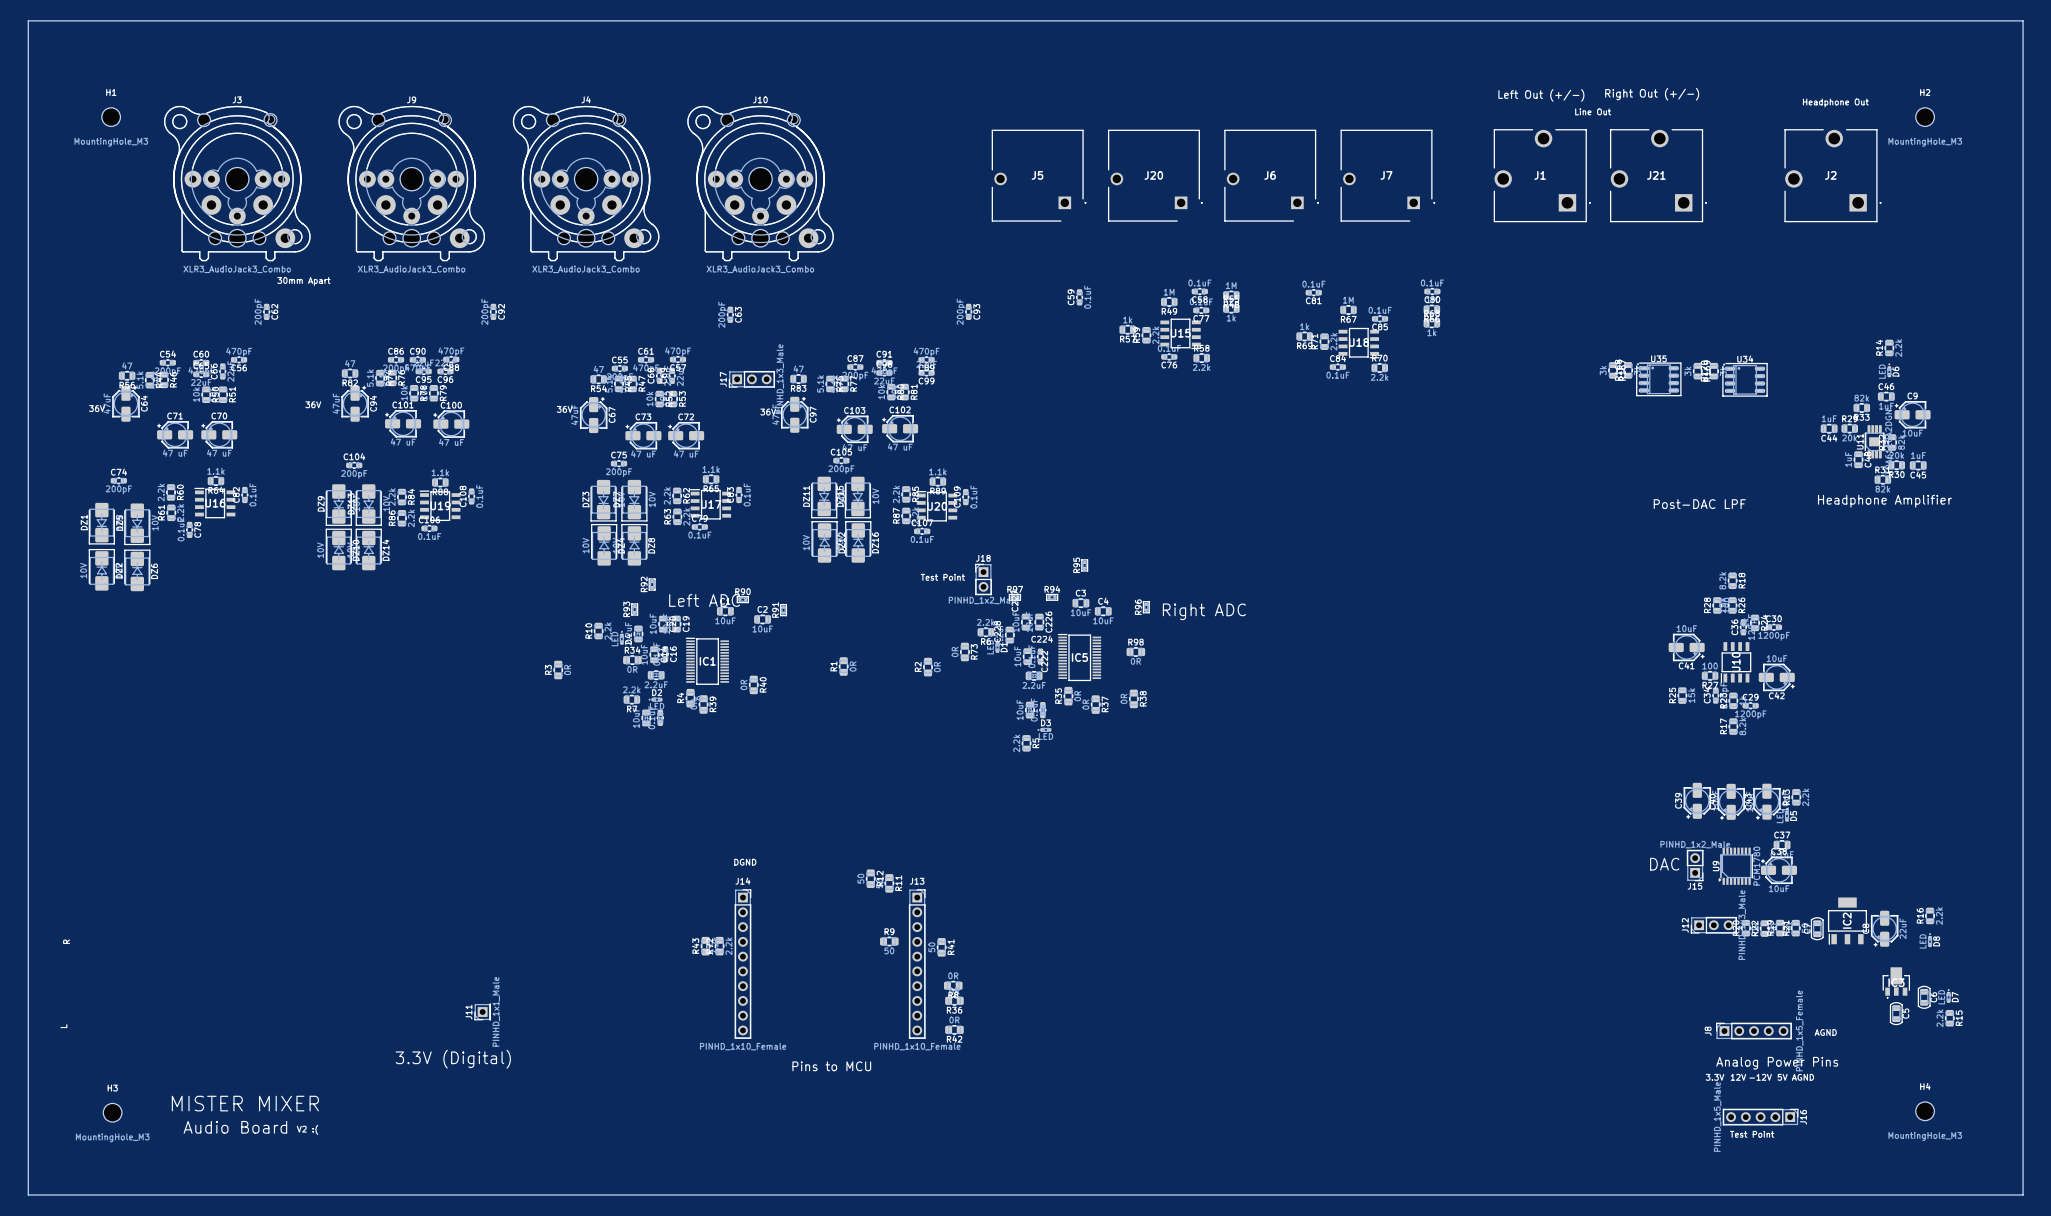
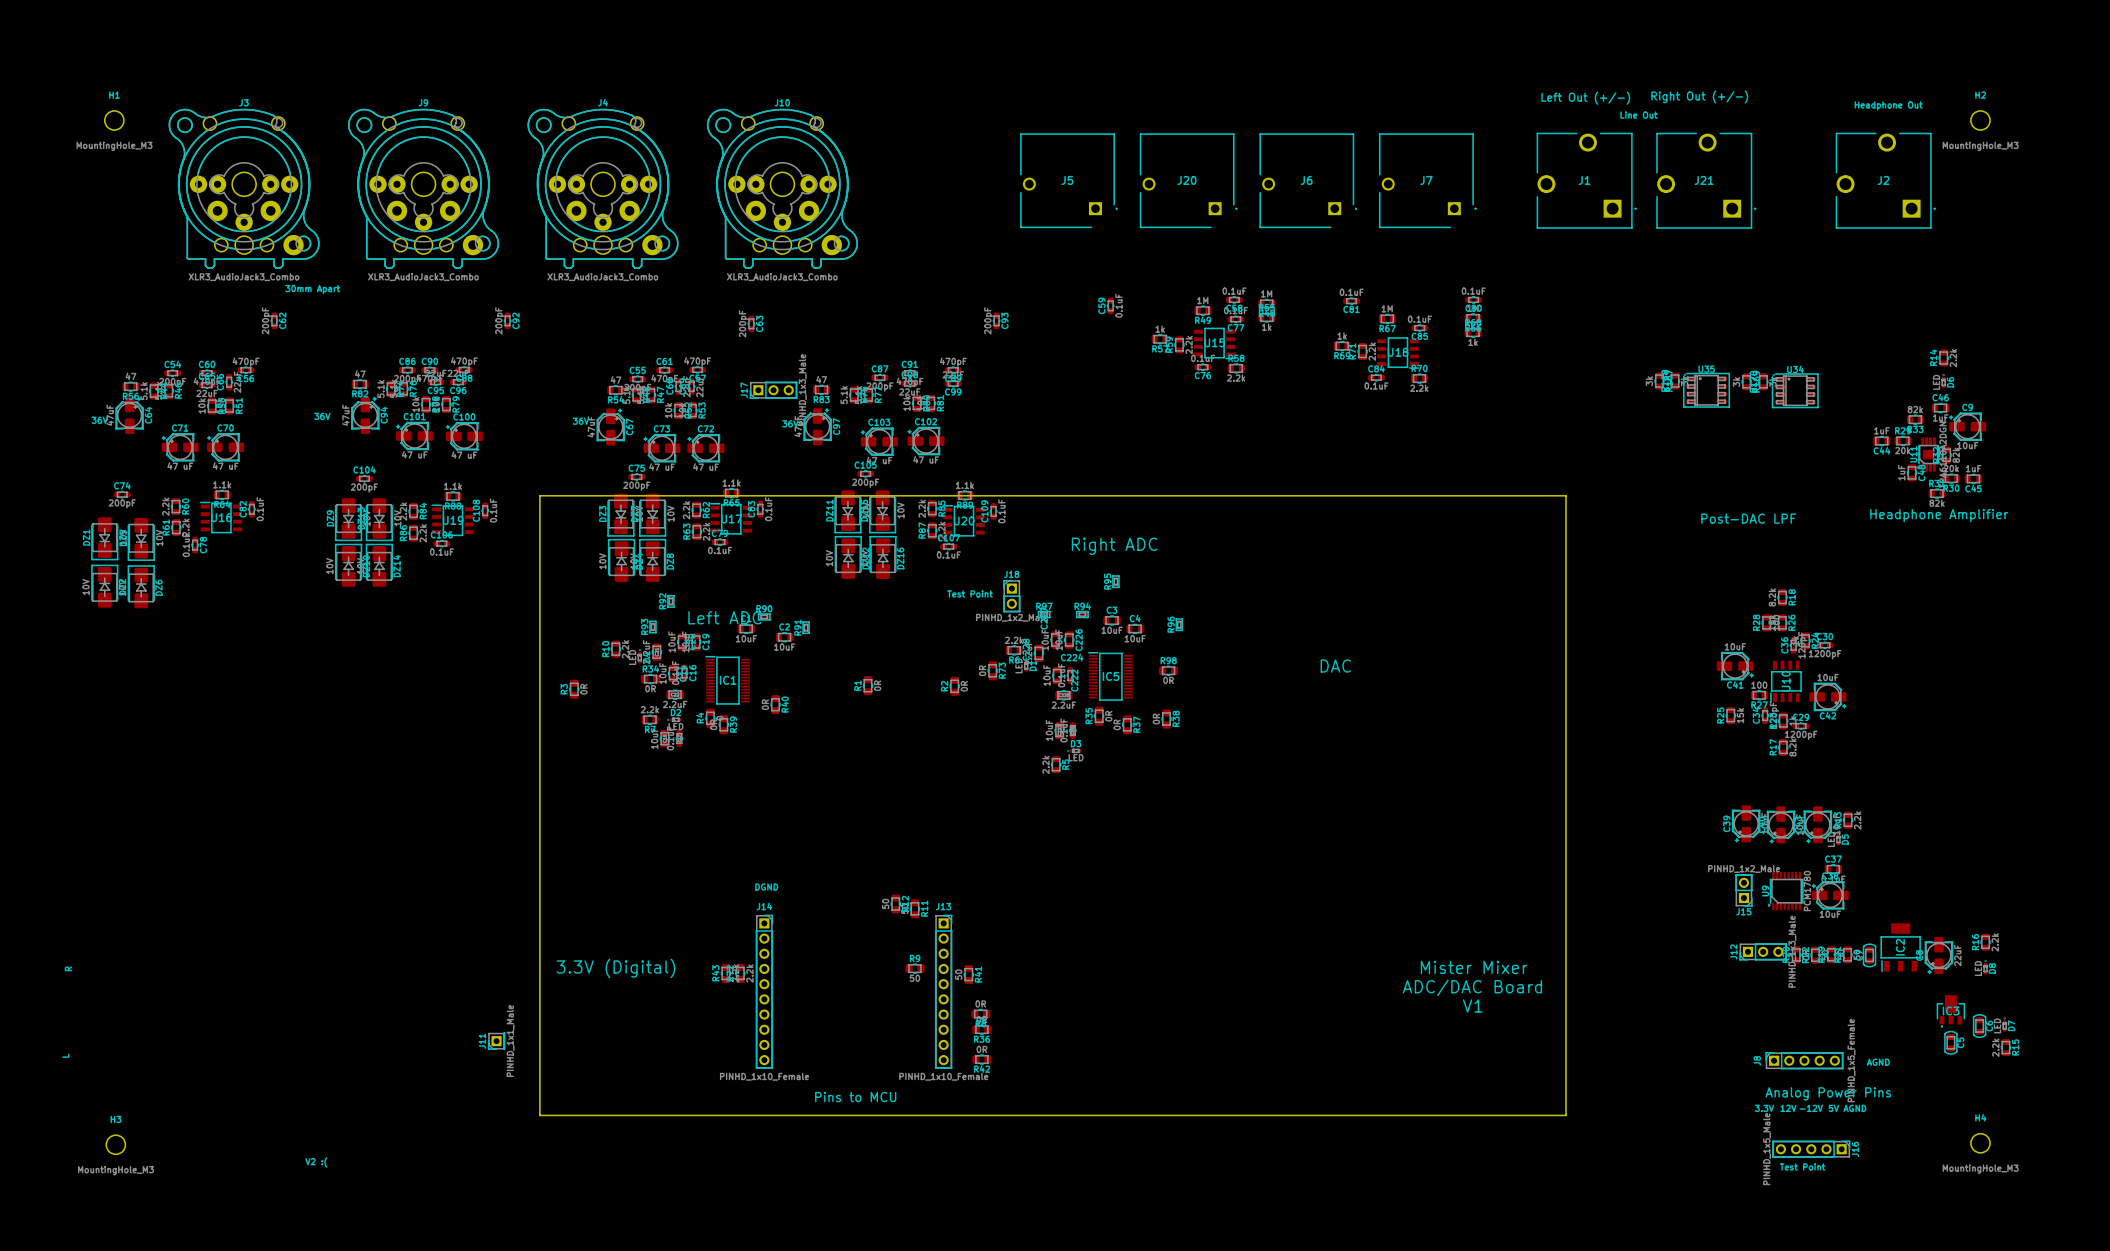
board edge: (28, 20) (2023, 20) (2023, 1195) (28, 1195) (28, 20) -> none
board edge: none -> (539, 495) (1566, 495) (1566, 1115) (539, 1115) (539, 495)
text: none -> Right ADC (1114, 546)
text: Right ADC (1204, 611) -> none
text: none -> DAC (1335, 665)
text: DAC (1664, 864) -> none
text: none -> Mister Mixer (1474, 967)
text: none -> 3.3V (Digital) (615, 968)
text: none -> ADC/DAC Board (1472, 987)
text: none -> V1 (1472, 1005)
text: 3.3V (Digital) (453, 1059) -> none
text: MISTER MIXER (245, 1103) -> none
text: Audio Board (235, 1127) -> none

